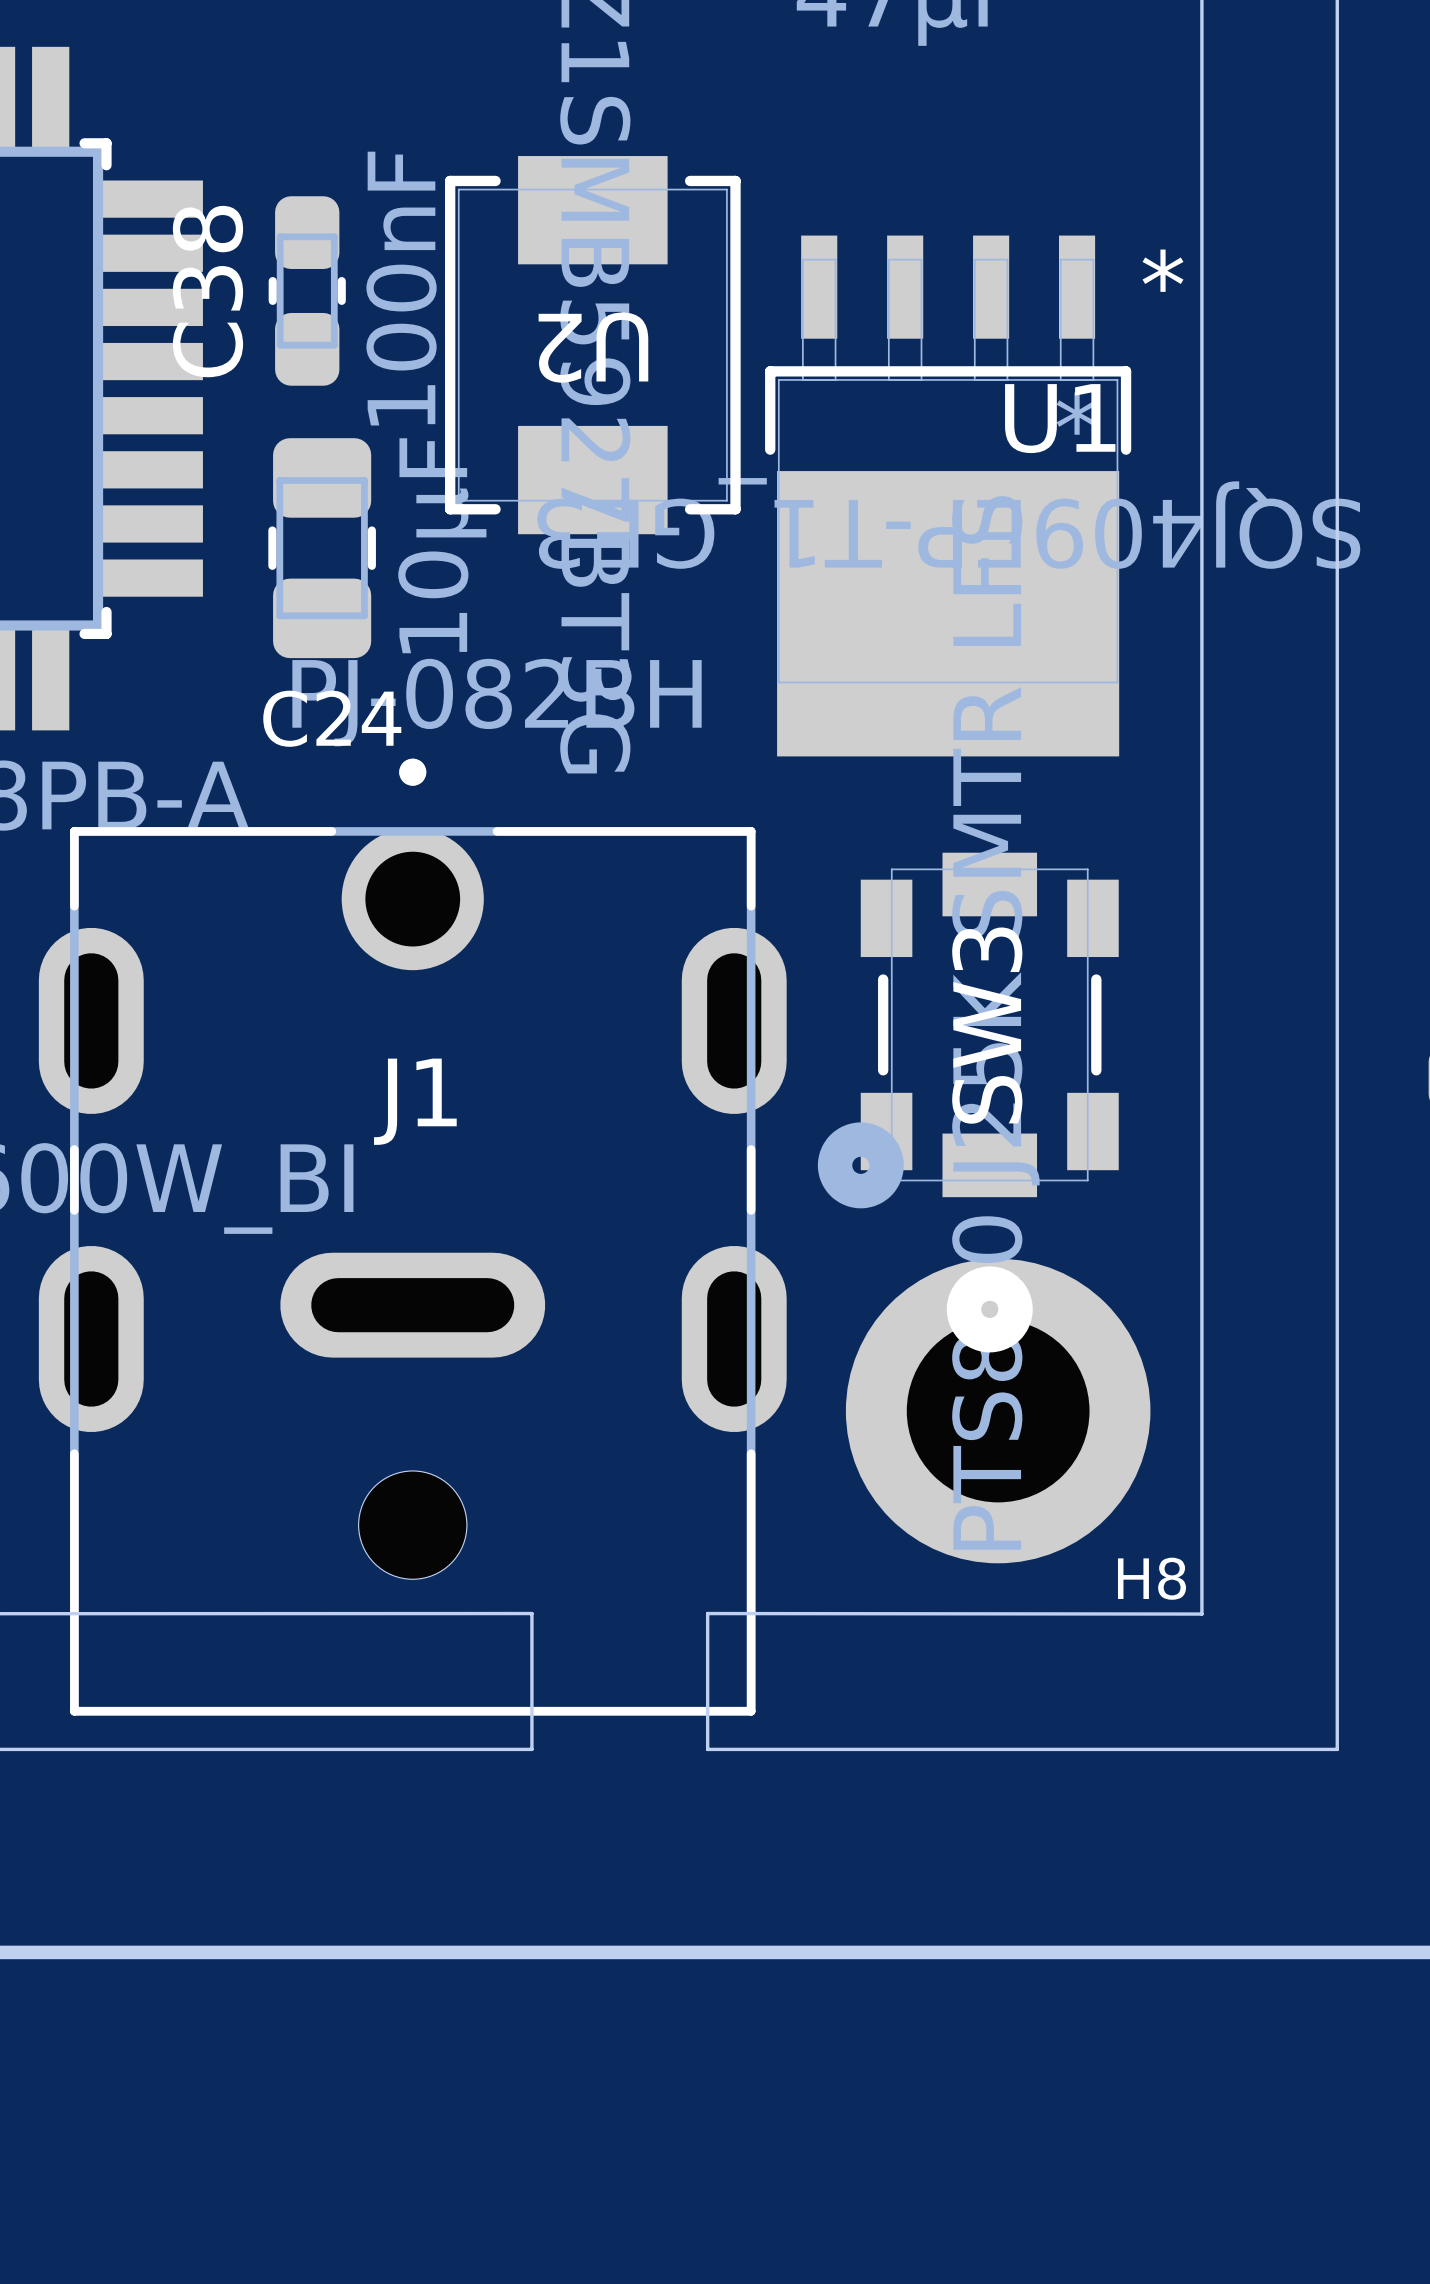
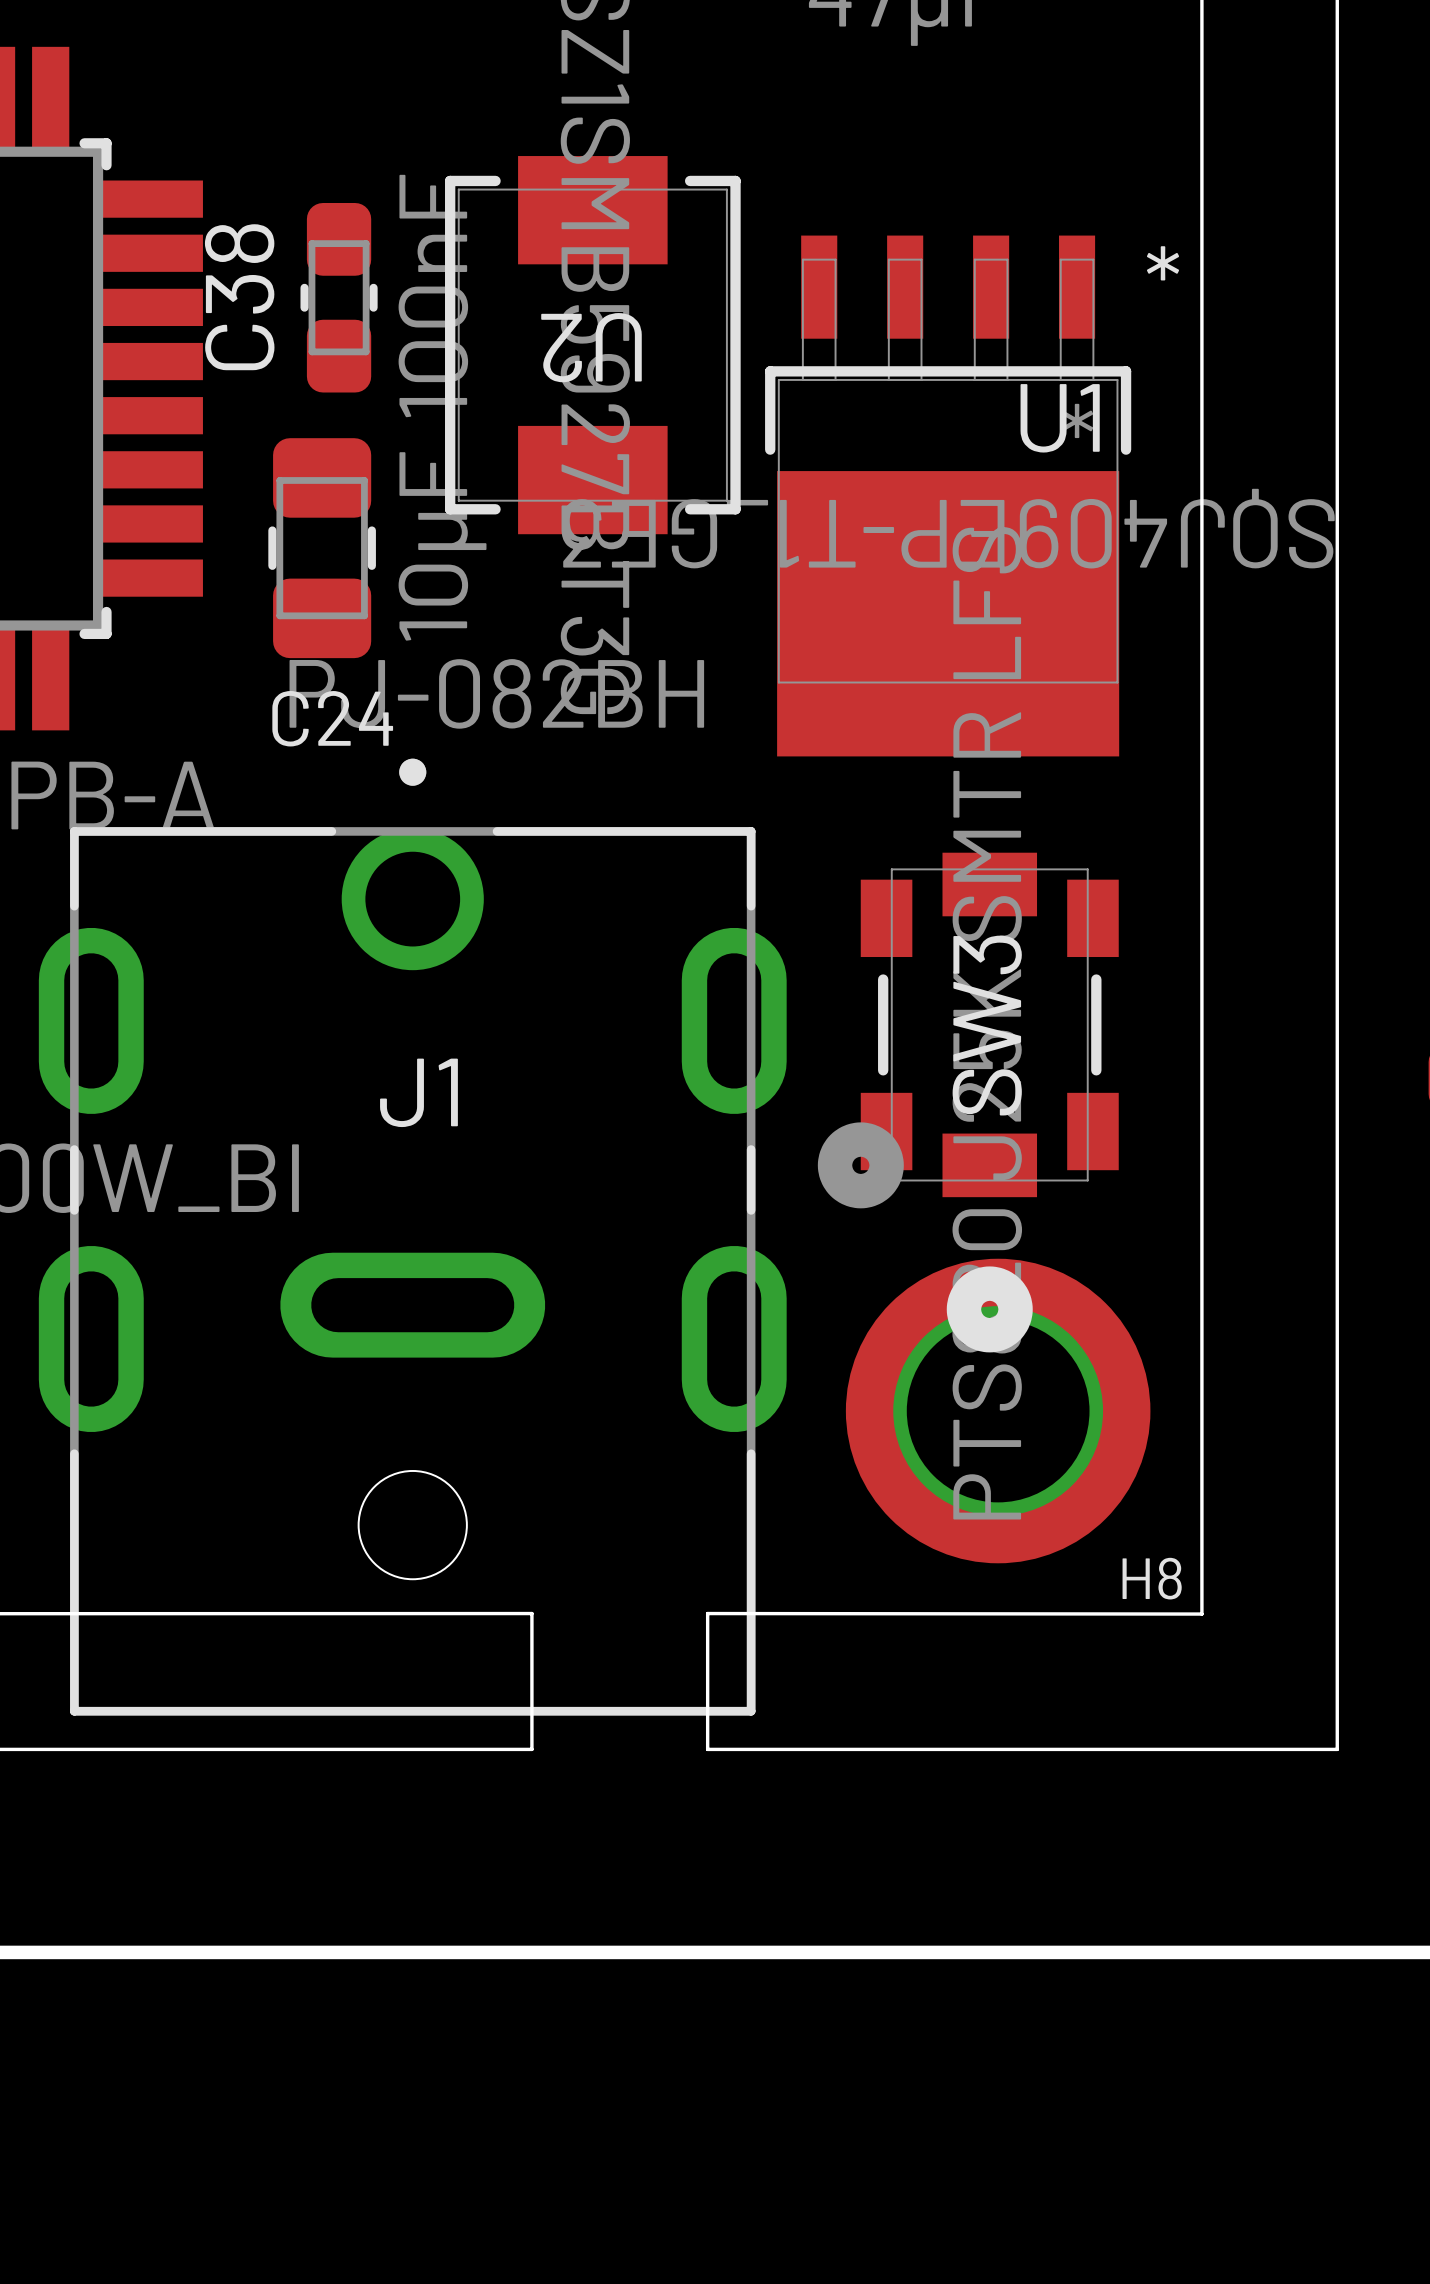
C38 position: (307, 290) -> (339, 297)

